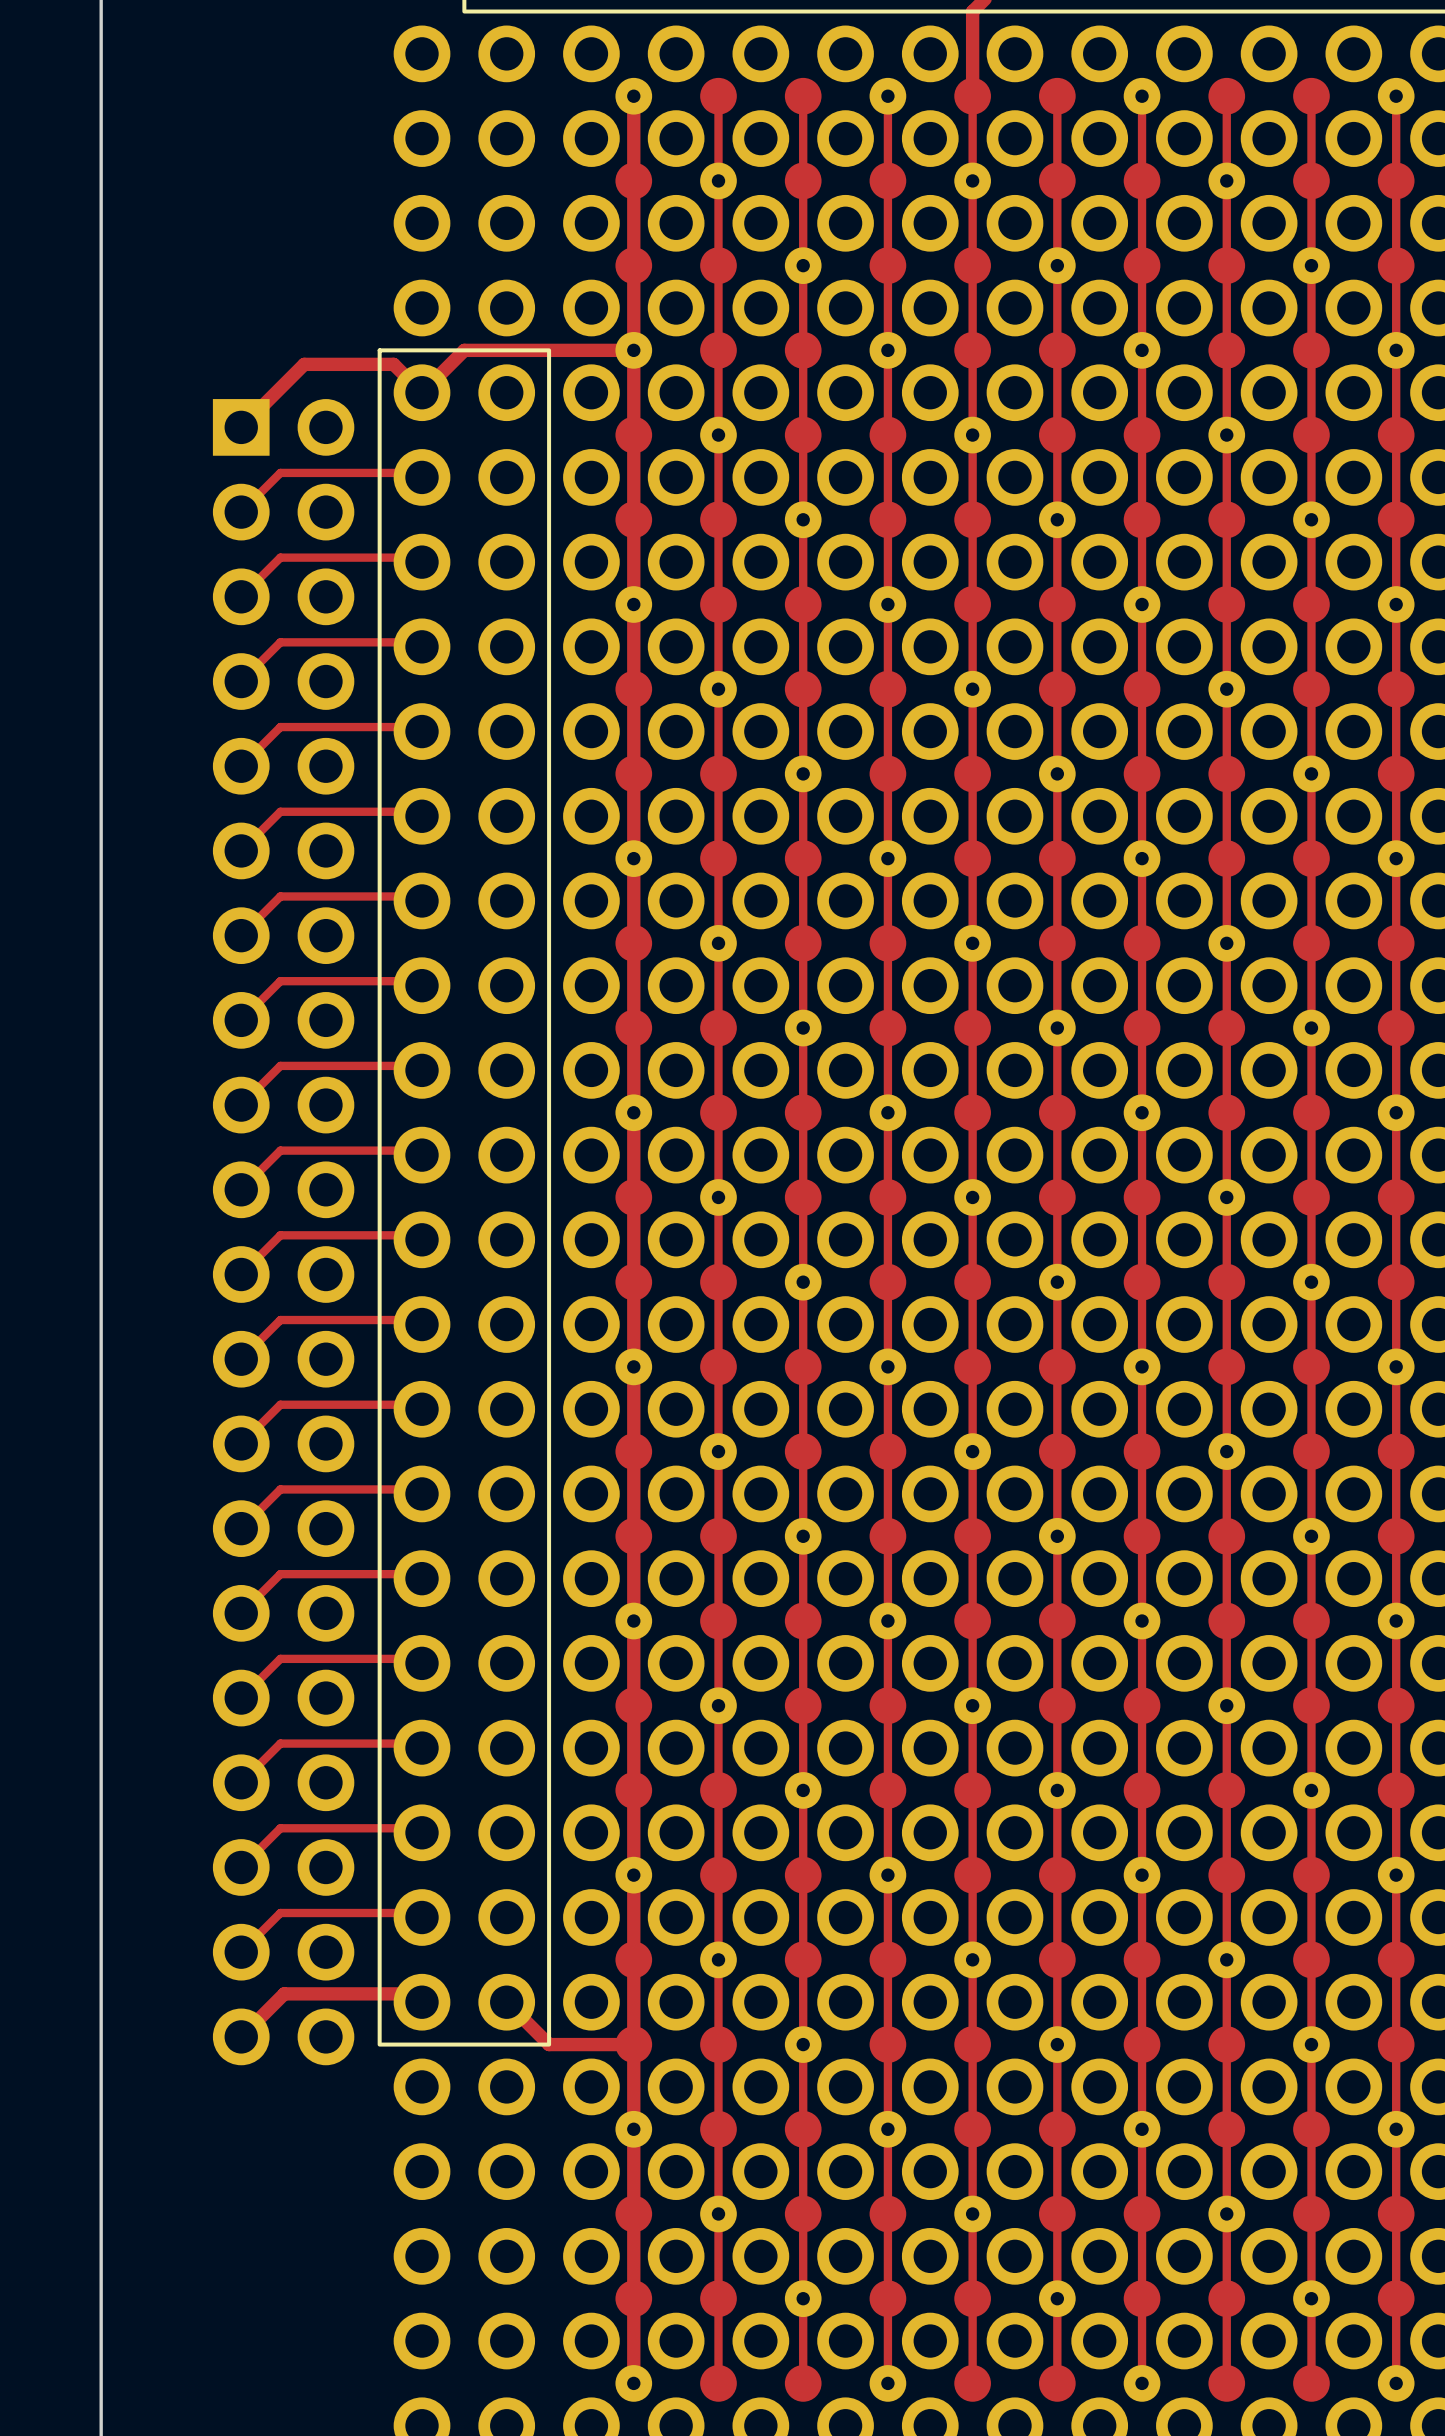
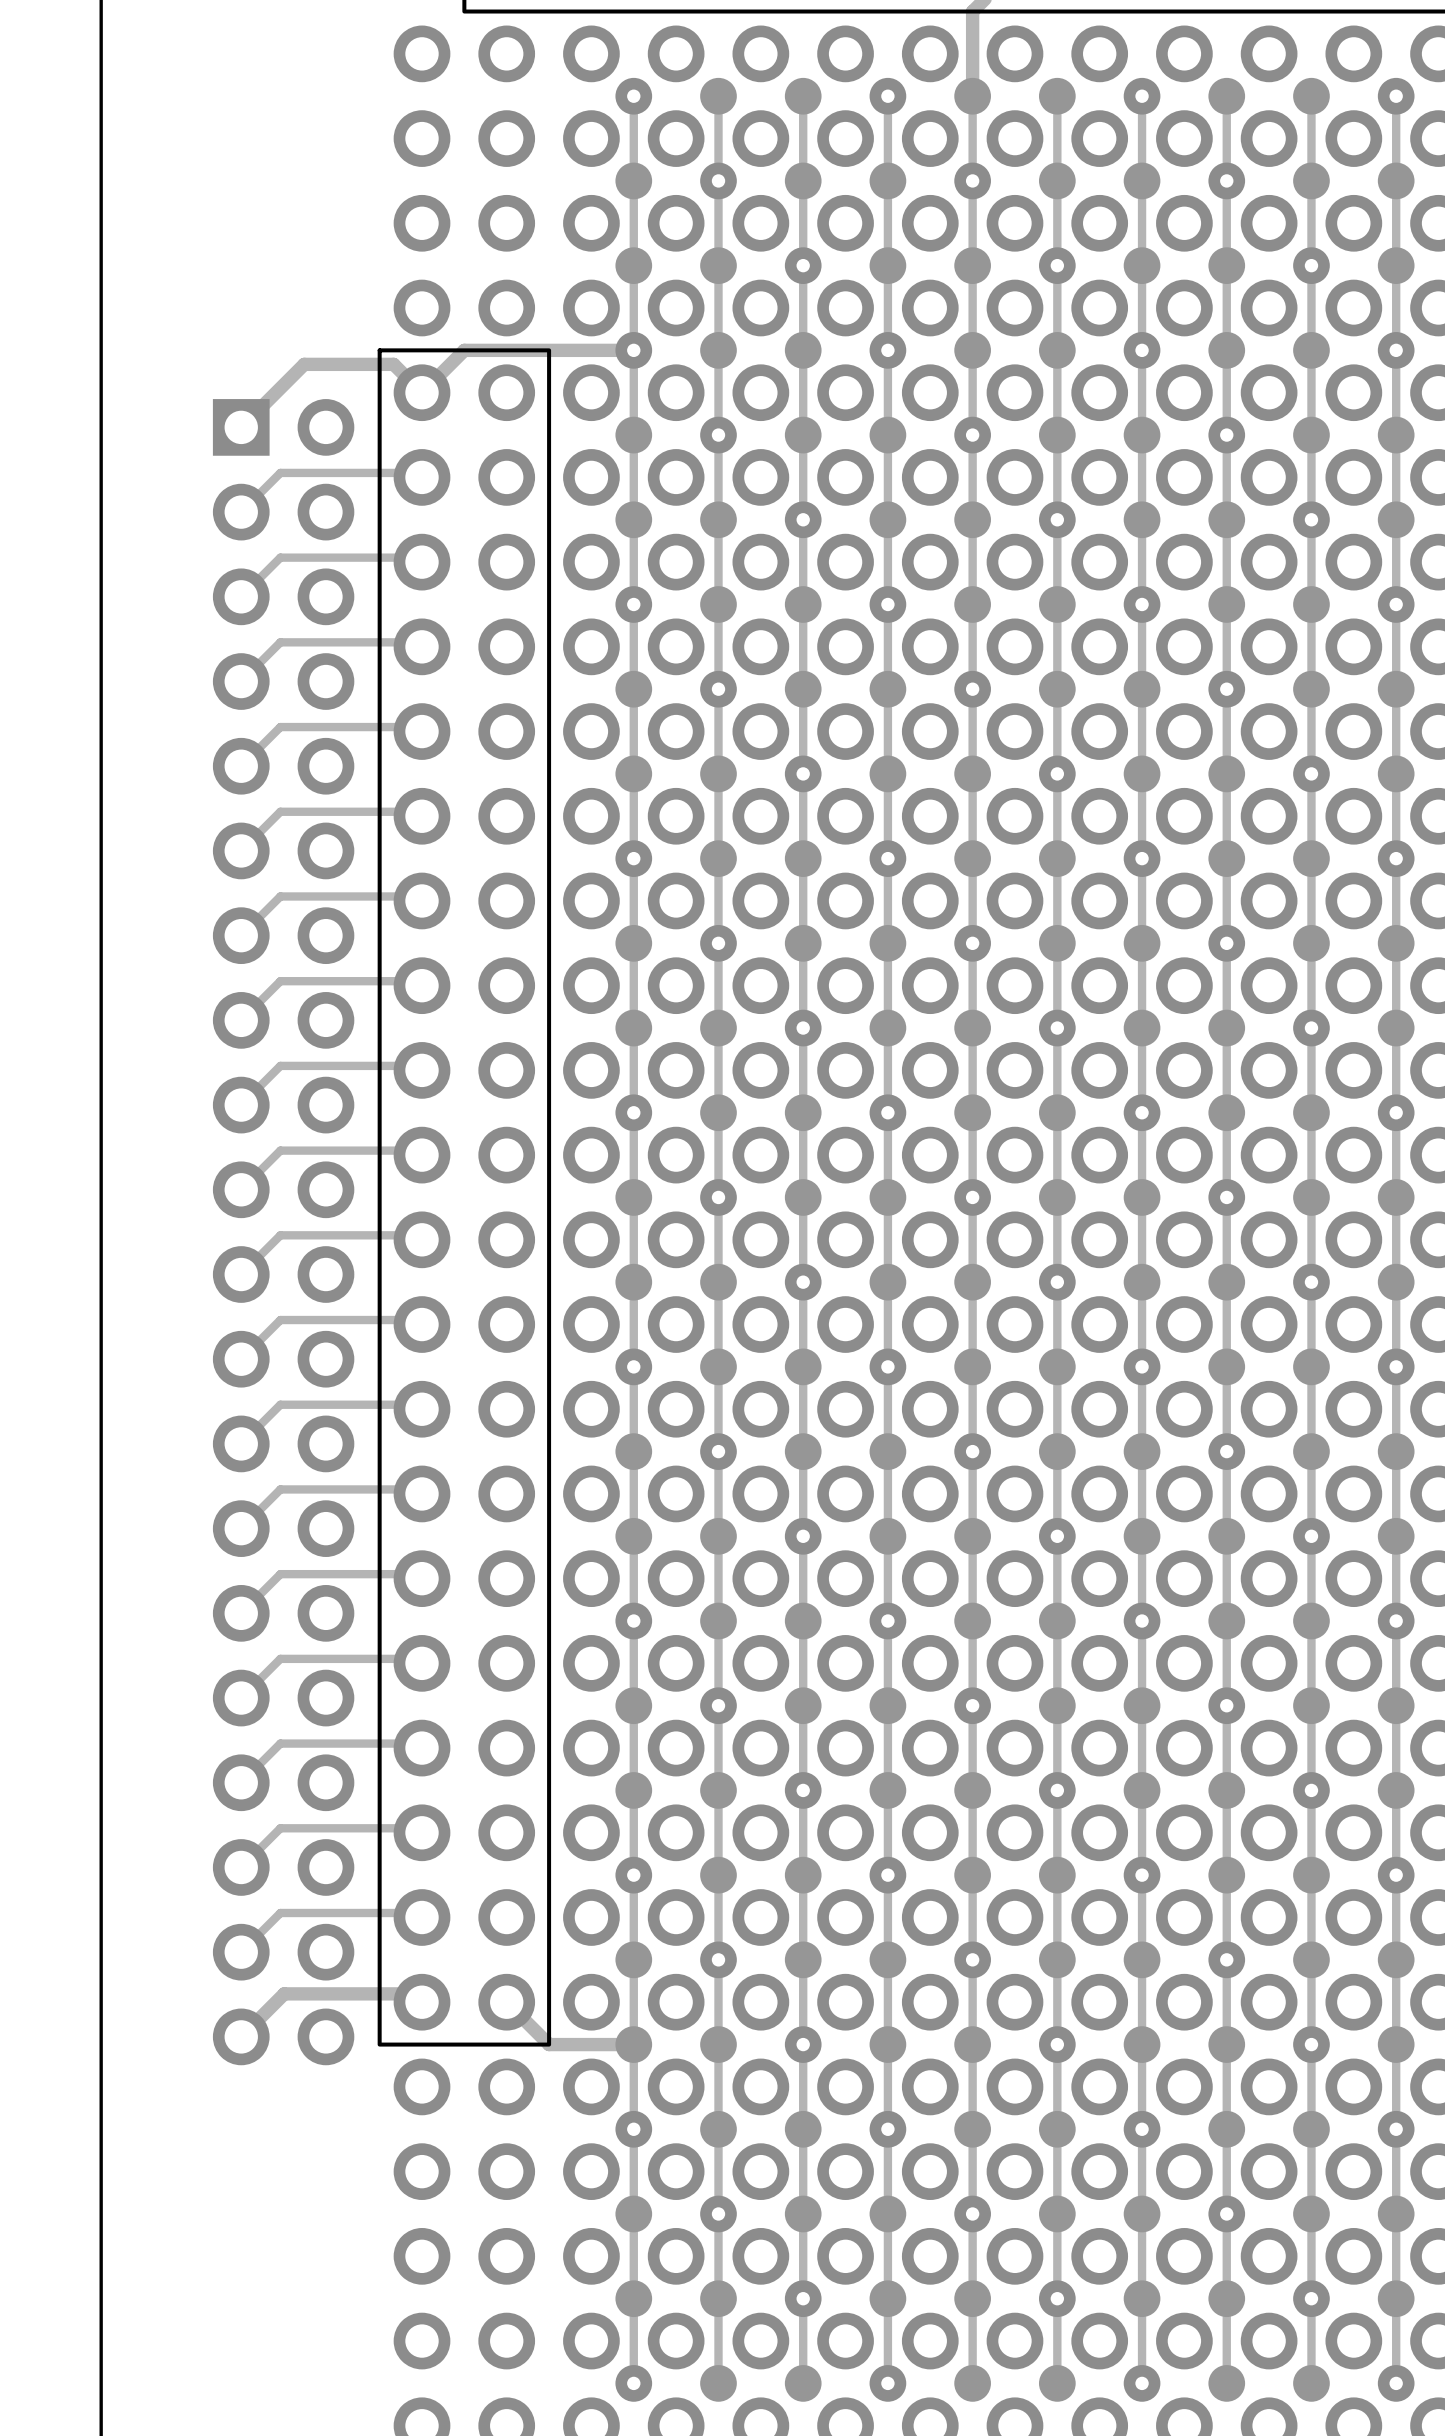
track width: thick (633, 96) (633, 2383) -> thin (633, 96) (633, 2383)

